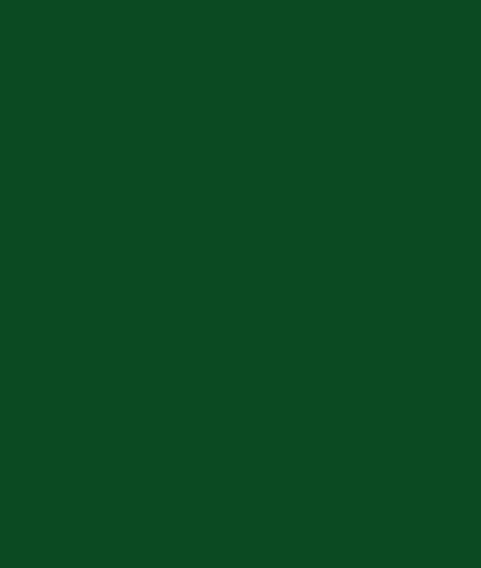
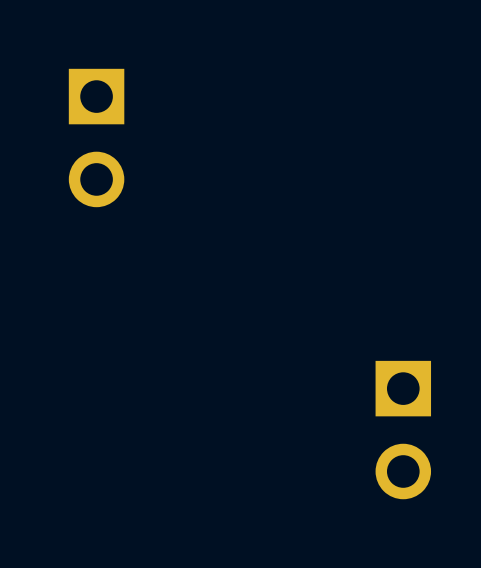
part: none -> (96, 138)
part: none -> (403, 430)

